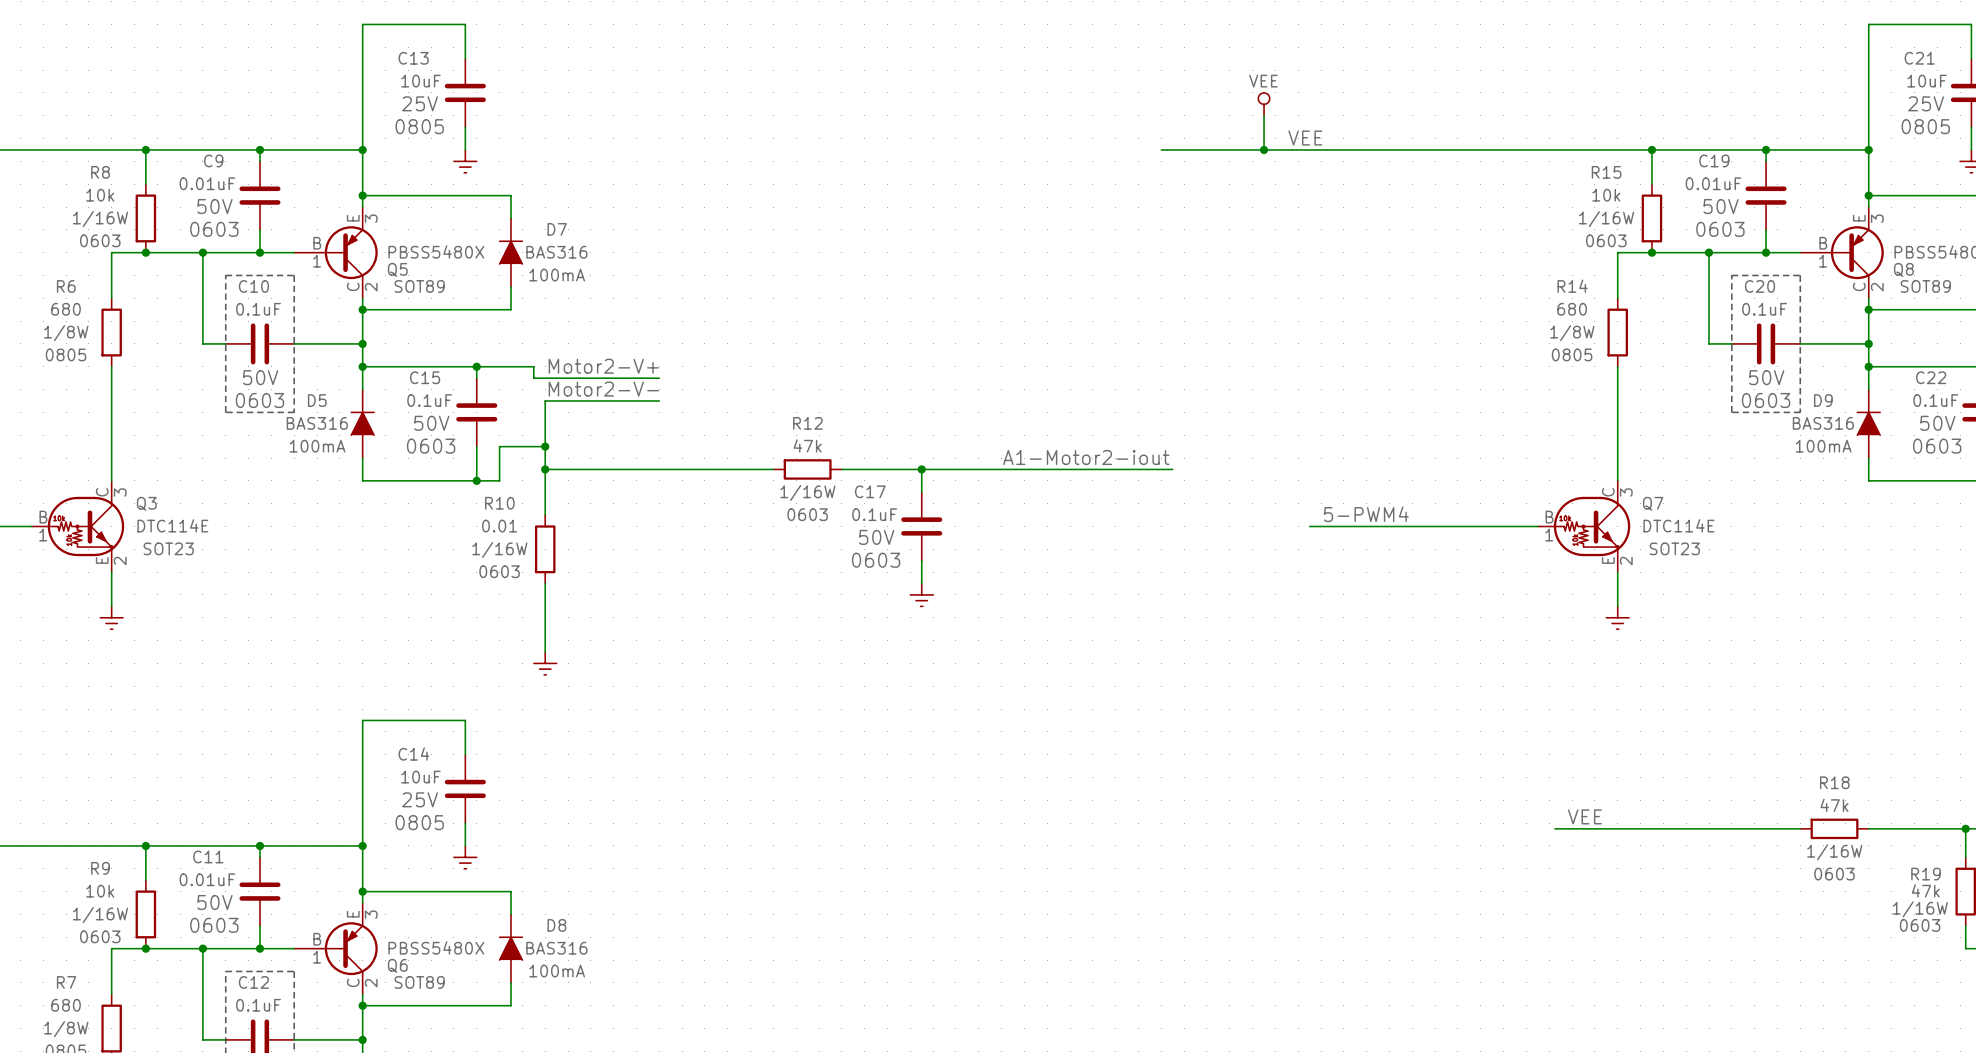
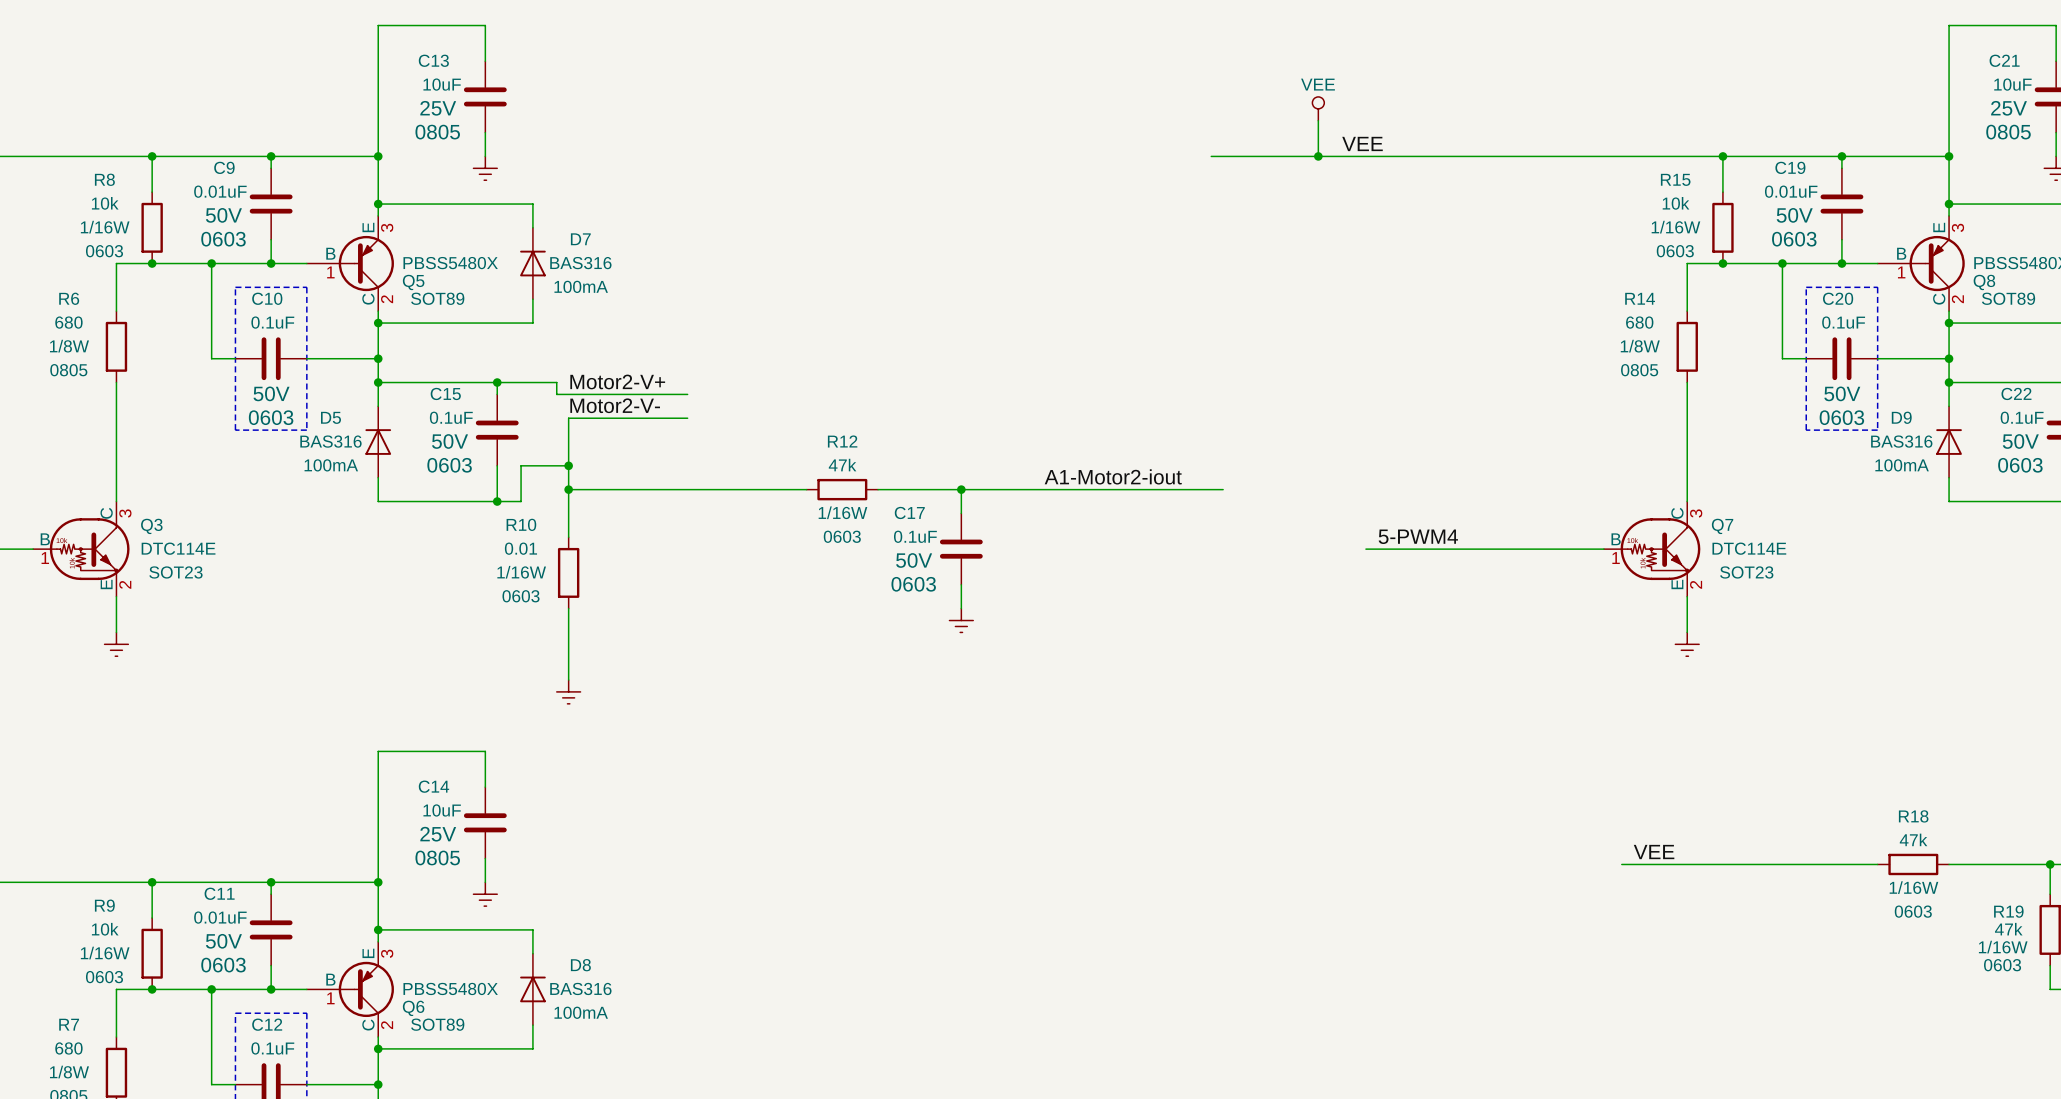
D7 symbol: [498, 218, 524, 287] -> [520, 227, 546, 300]
D5 symbol: [350, 389, 375, 459] -> [365, 406, 392, 478]
D9 symbol: [1856, 389, 1881, 459] -> [1936, 406, 1962, 478]
D8 symbol: [498, 914, 524, 983] -> [520, 953, 546, 1026]

